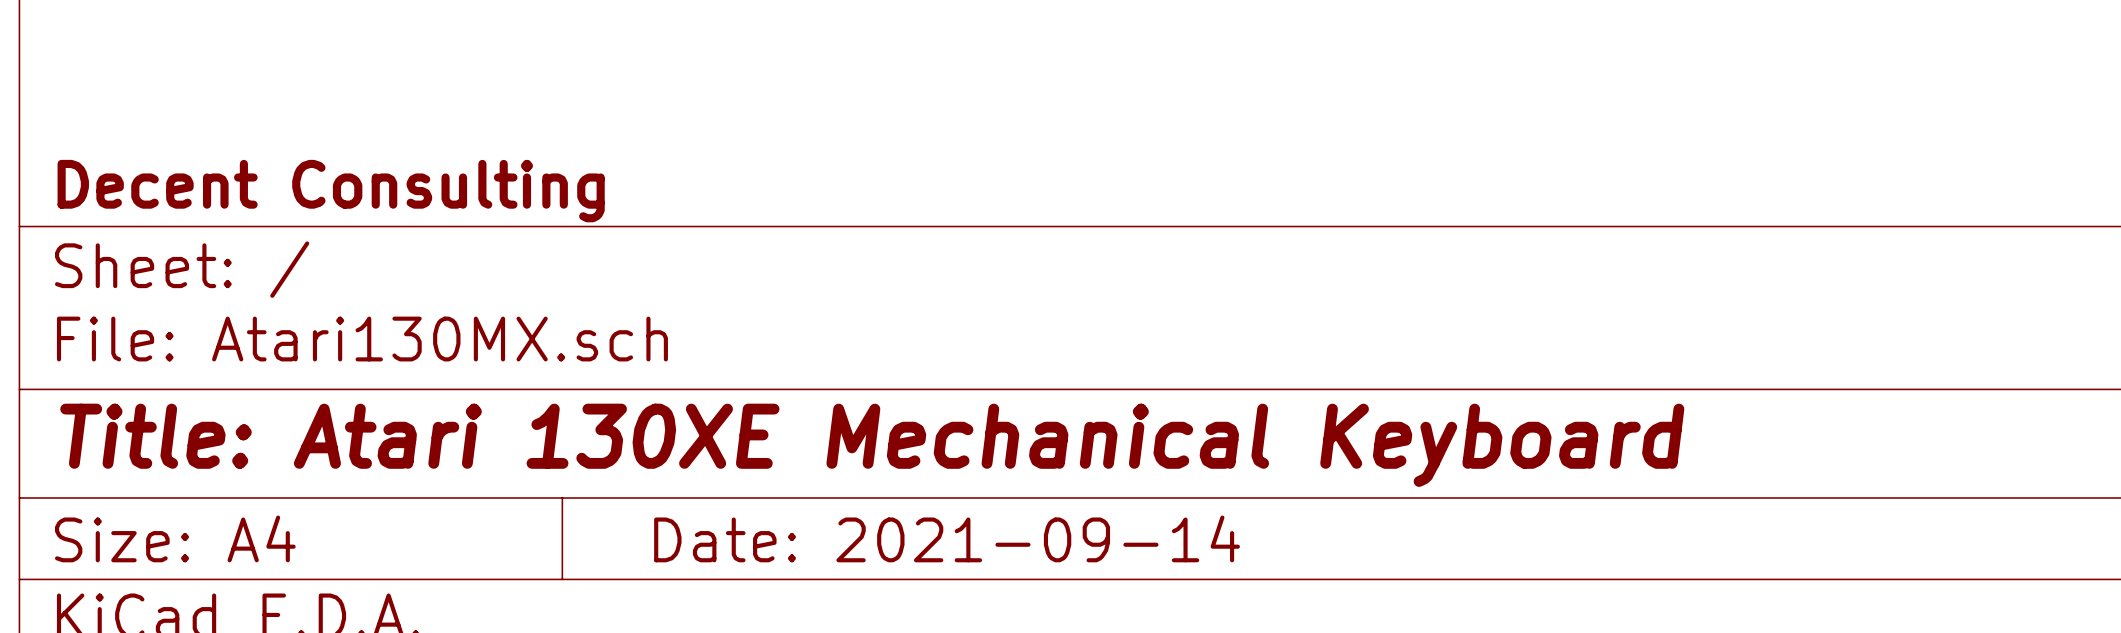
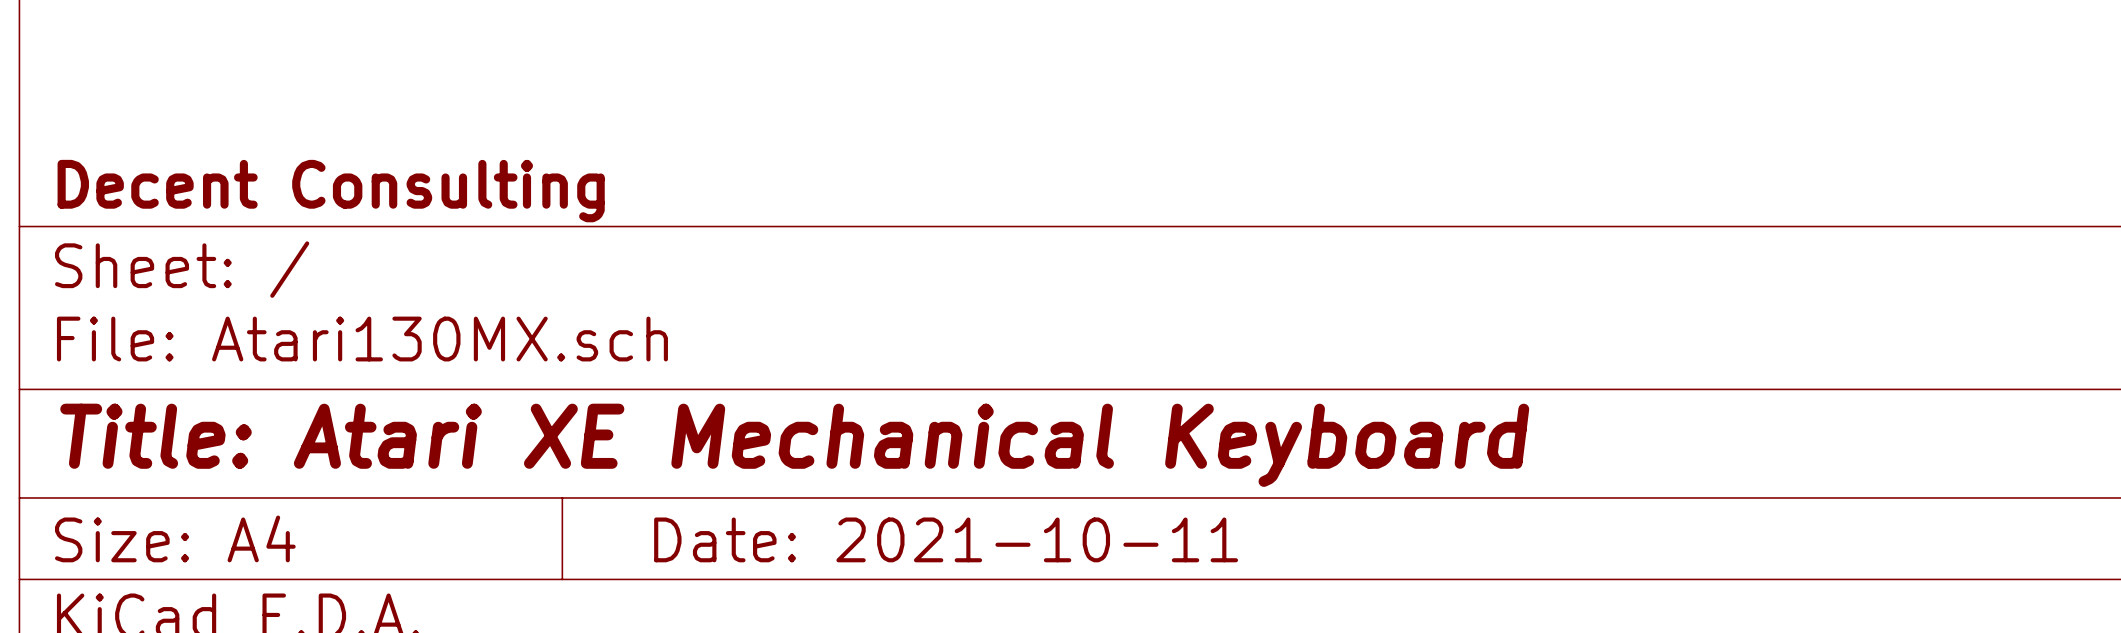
title block: Title: Atari 130XE Mechanical Keyboard (872, 445) -> Title: Atari XE Mechanical Keyboard (794, 445)
title block: Date: 2021-09-14 (947, 538) -> Date: 2021-10-11 (946, 539)

